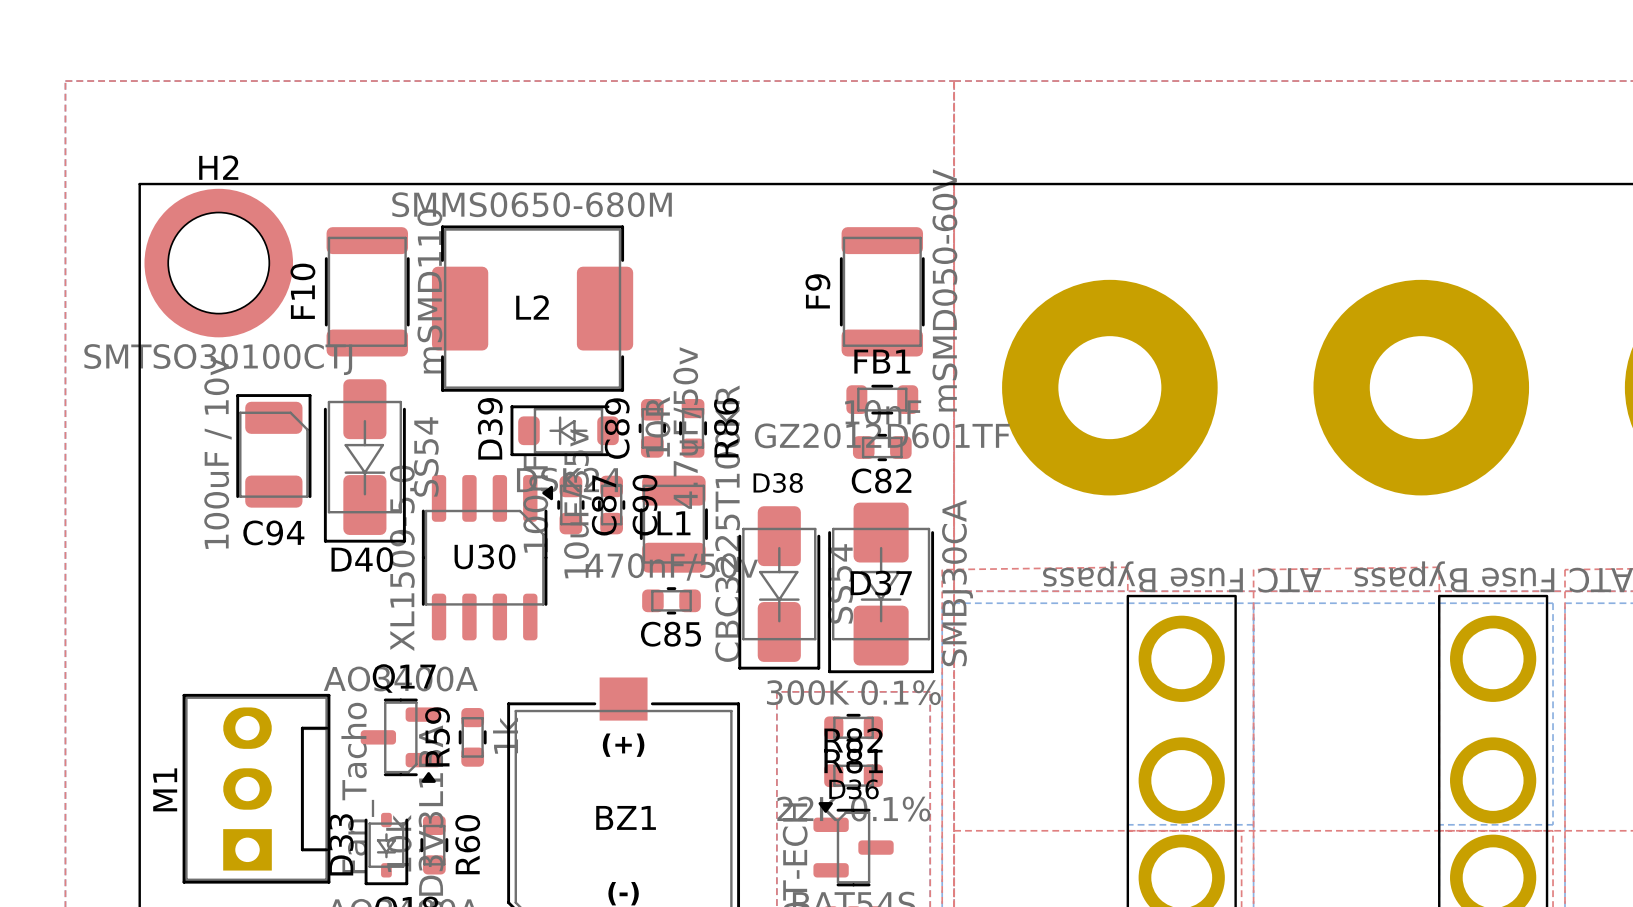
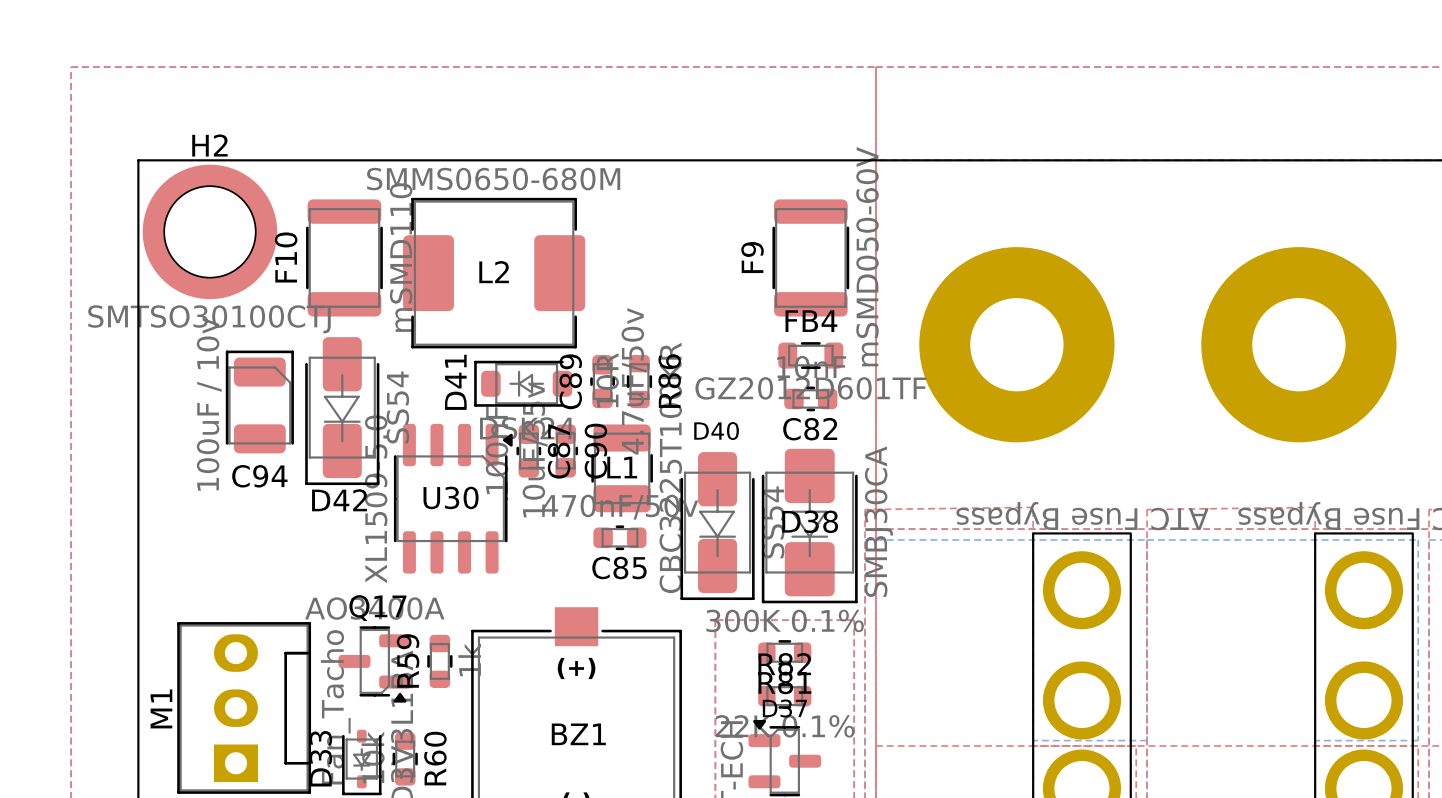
FB1 name: FB1 (882, 361) -> FB4 (811, 321)
D39 name: D39 (490, 428) -> D41 (455, 382)
D38 name: D38 (778, 482) -> D40 (716, 431)
D40 name: D40 (362, 559) -> D42 (339, 500)
D37 name: D37 (881, 583) -> D38 (810, 521)
D36 name: D36 (854, 789) -> D37 (784, 708)

